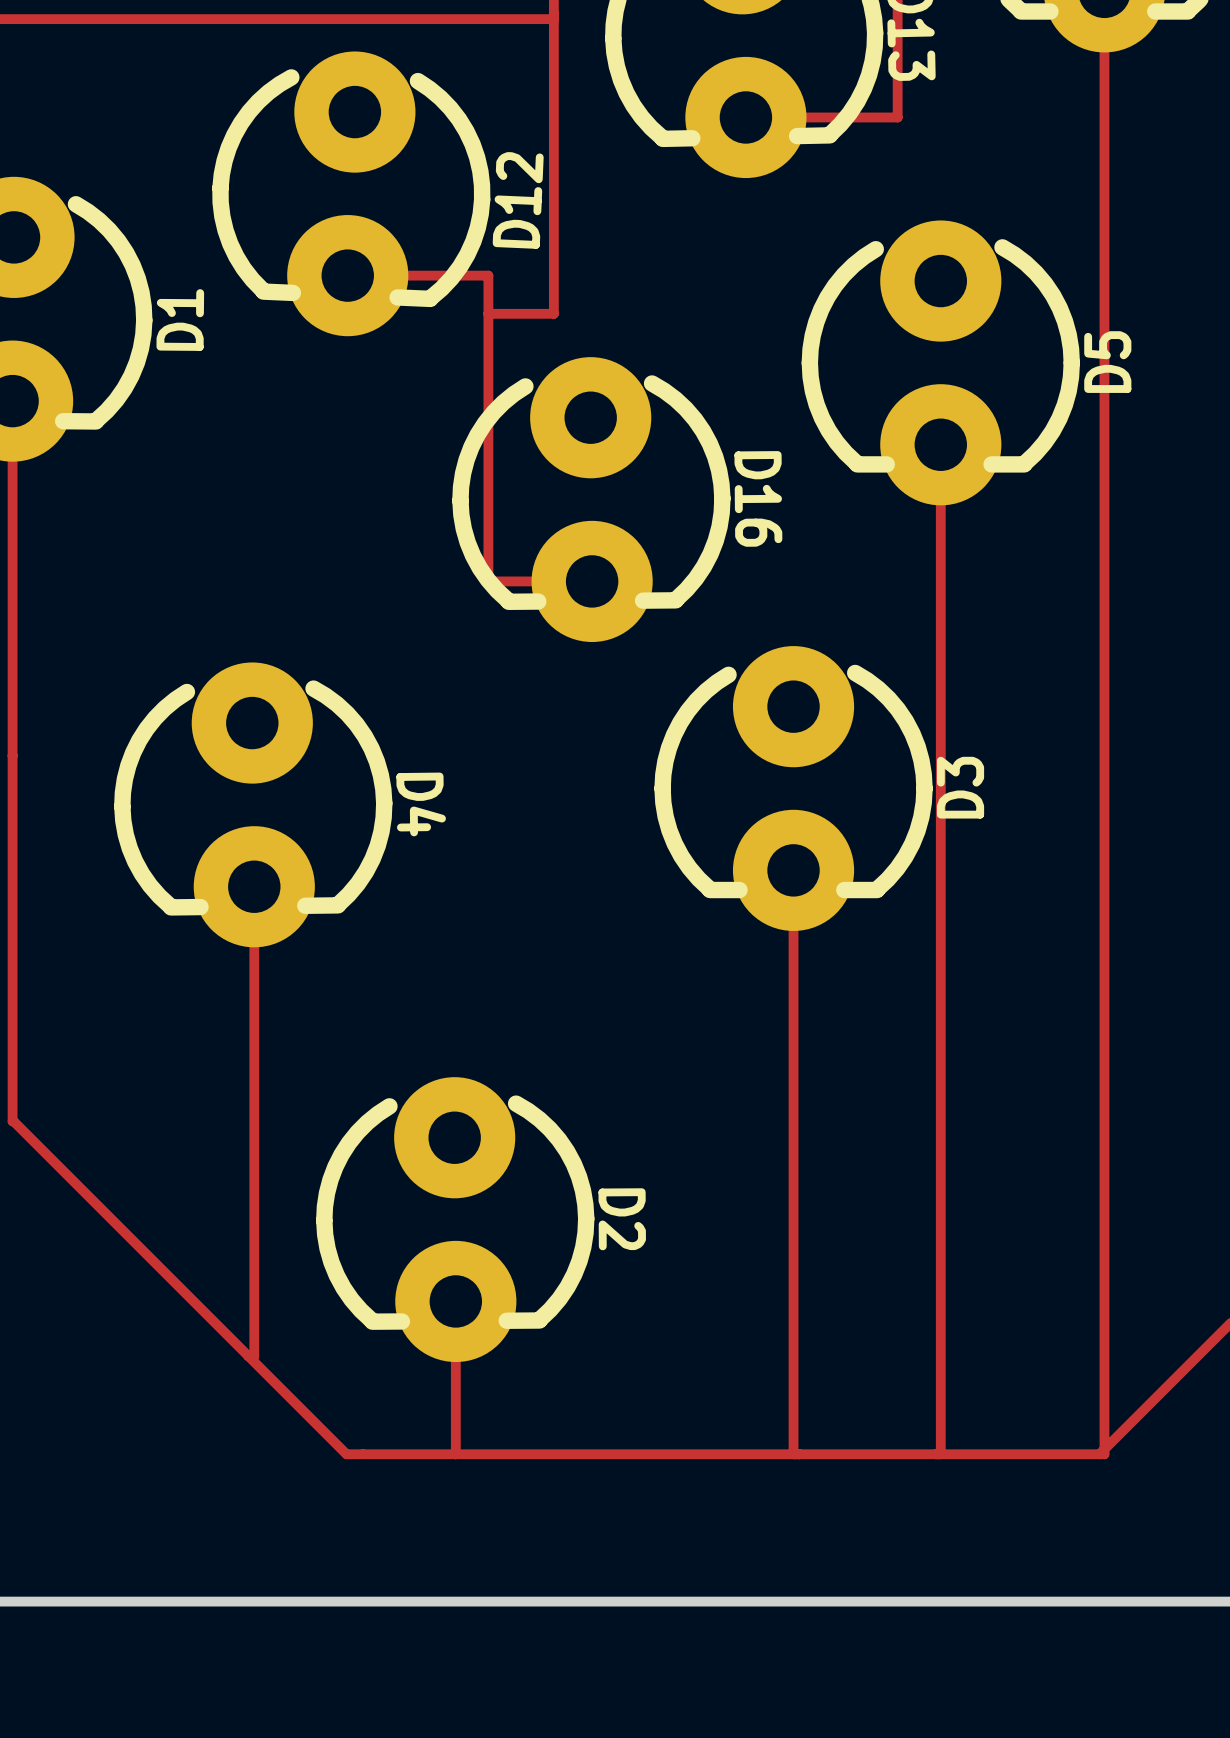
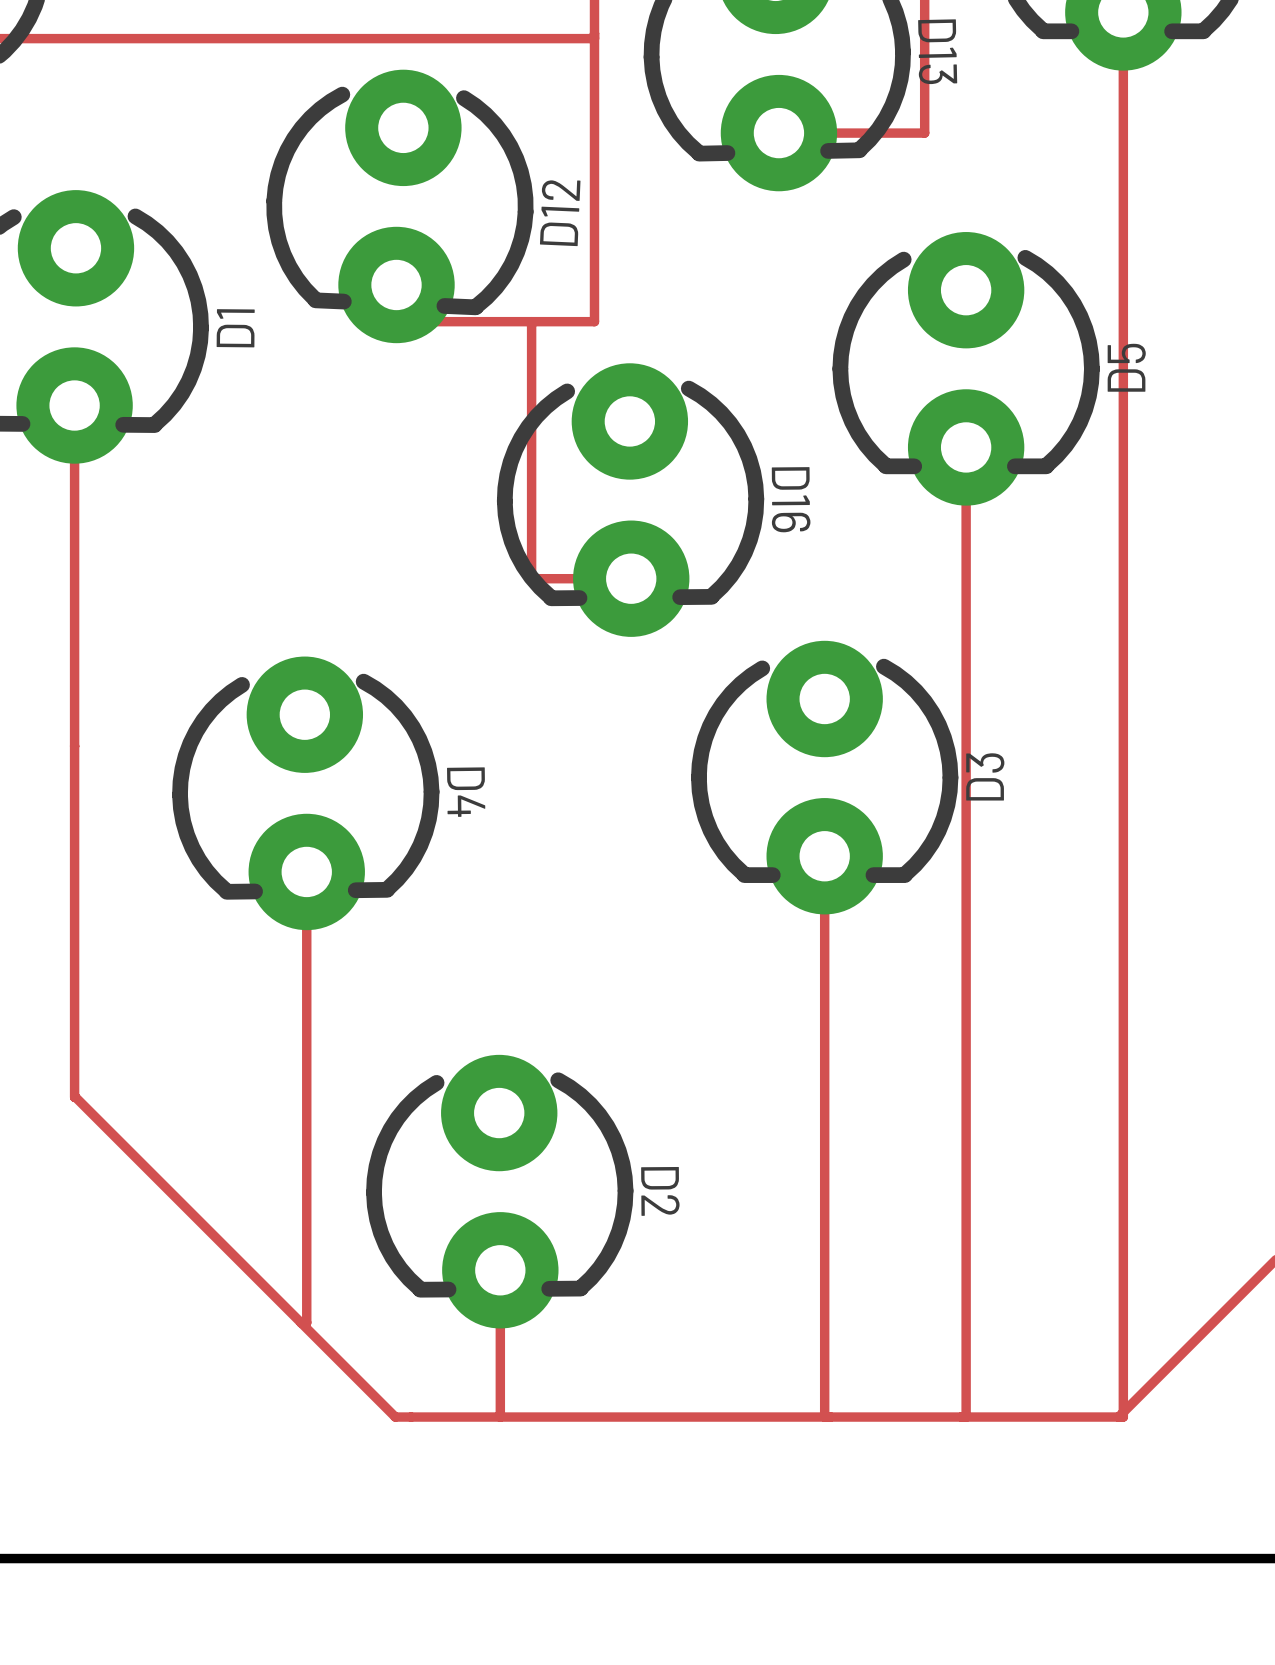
track: (347, 275) (488, 275) (488, 313) -> (396, 284) (433, 321) (531, 321)

